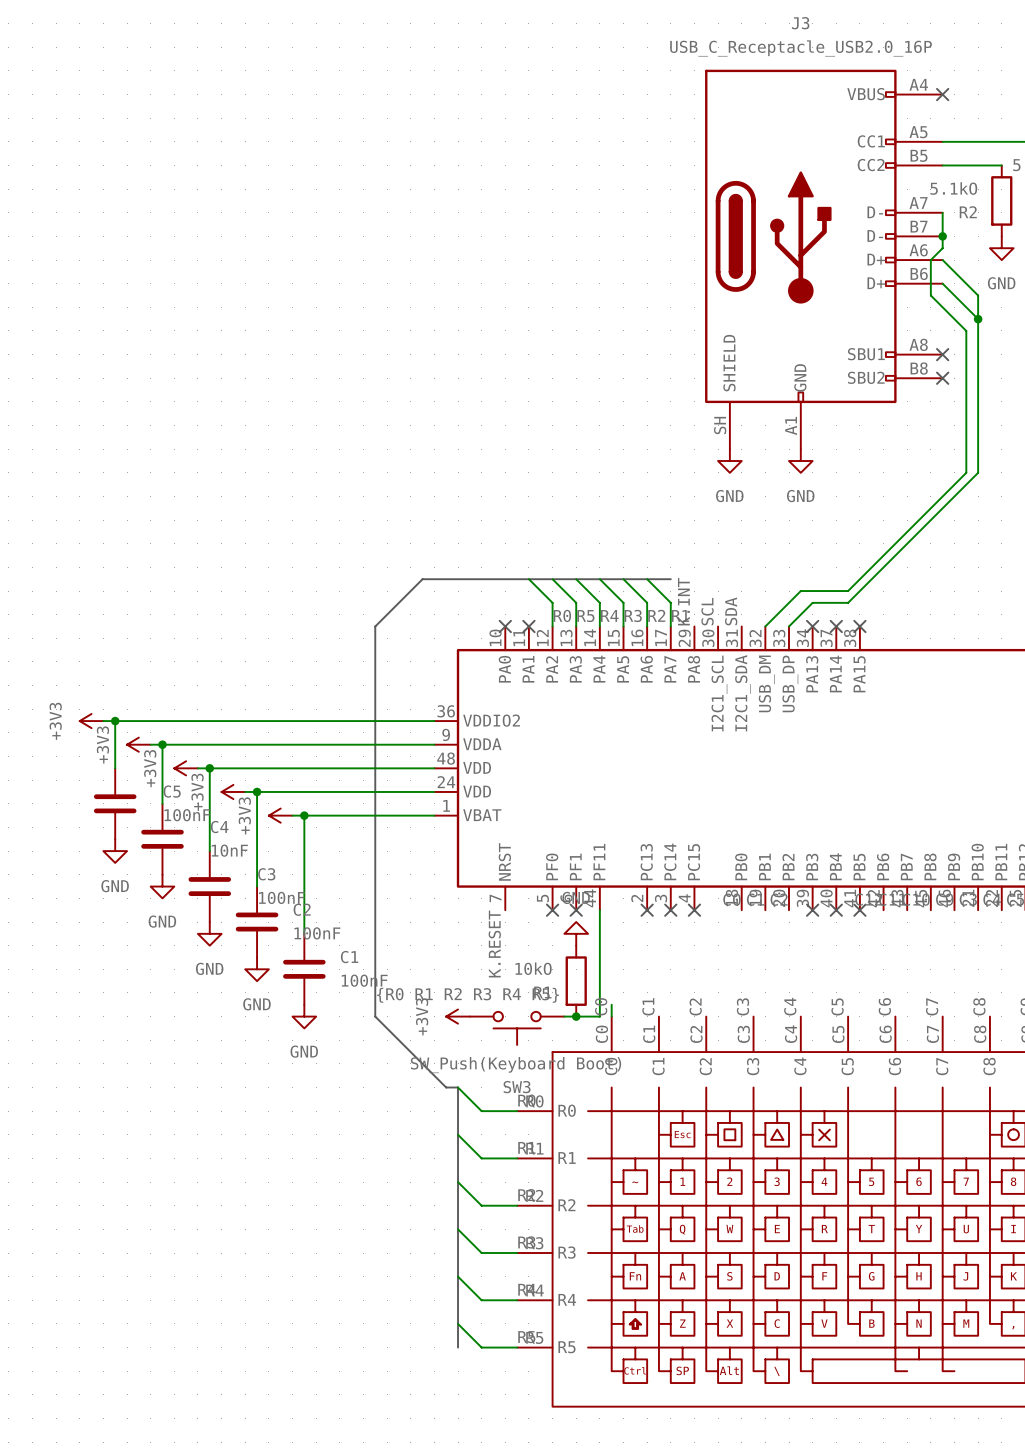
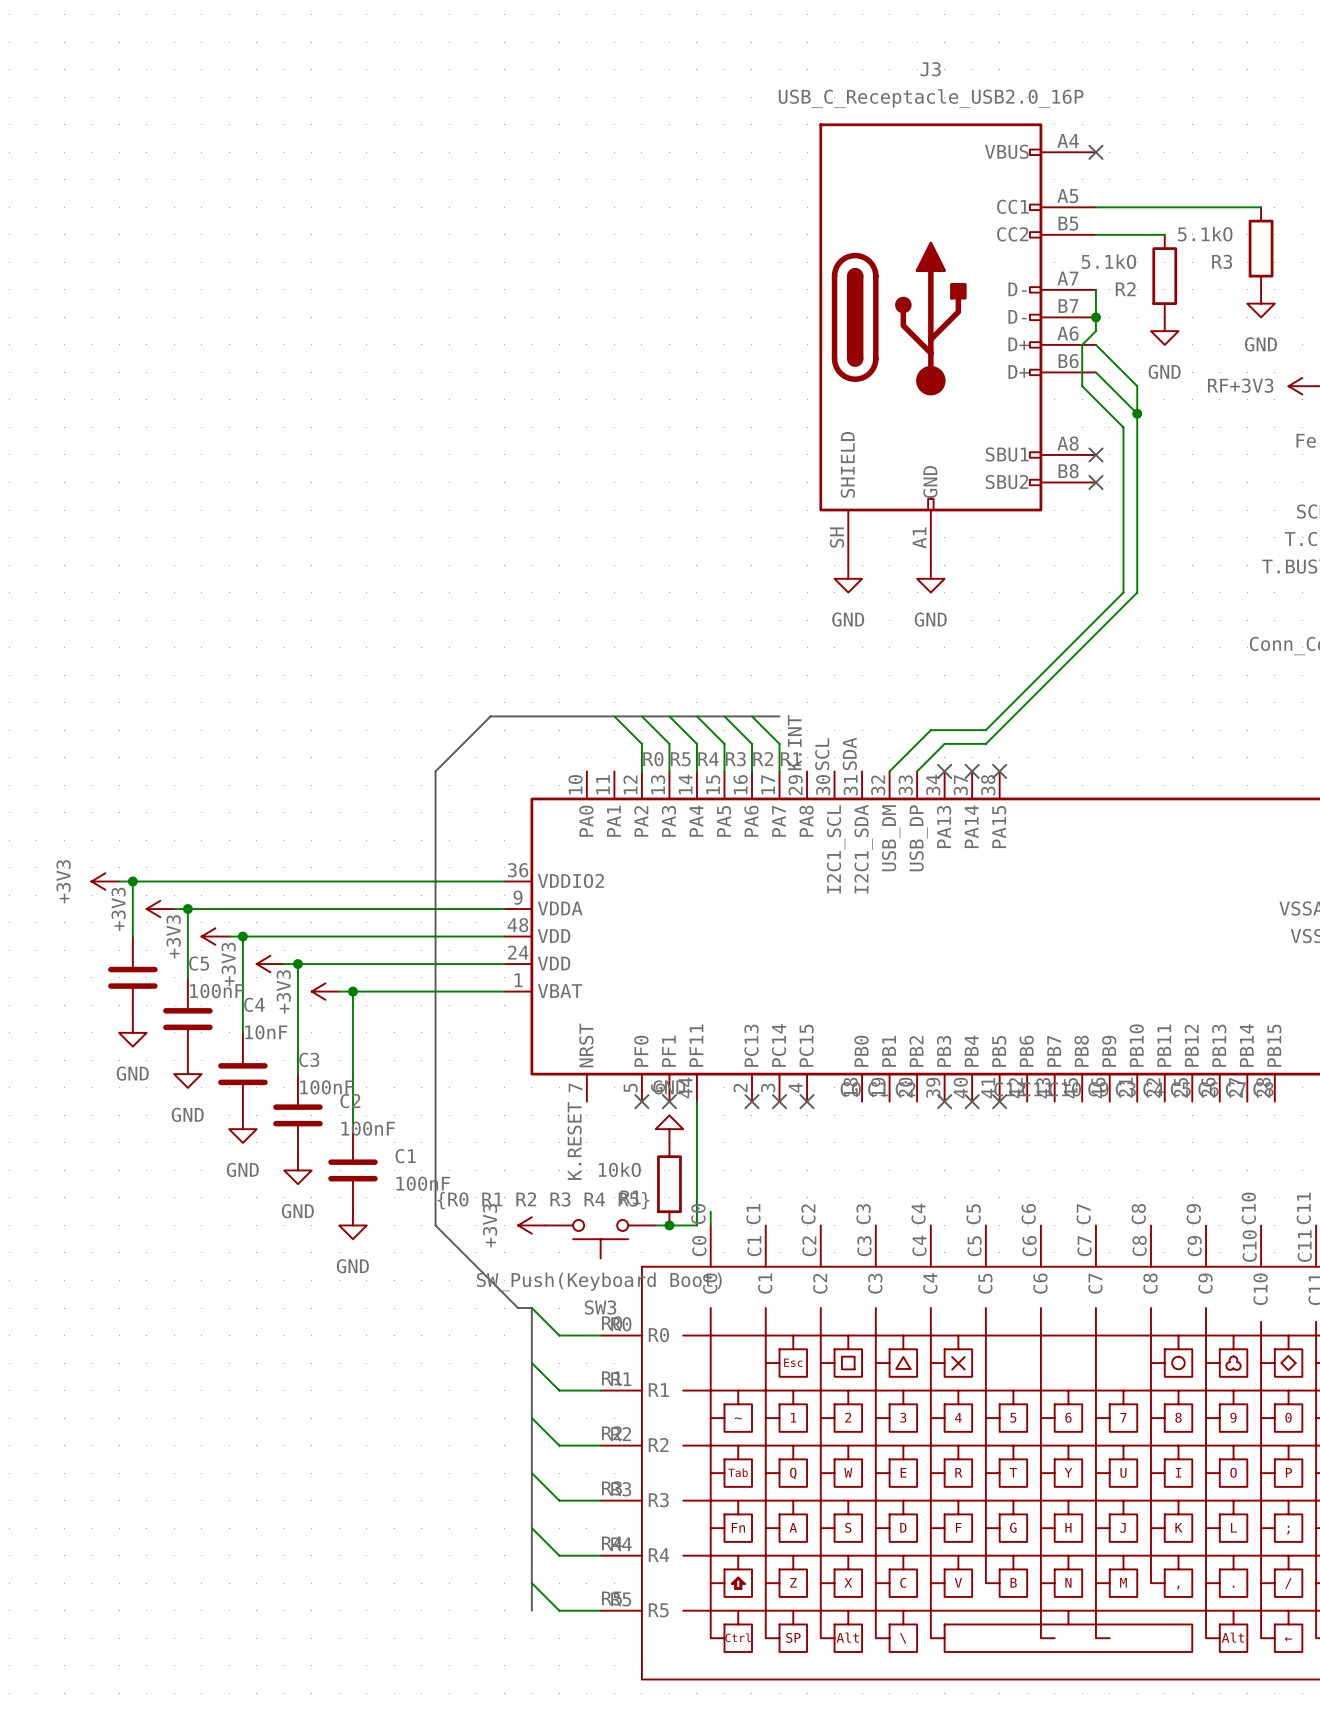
no-connect mark: (505, 626) -> none
no-connect mark: (528, 626) -> none

